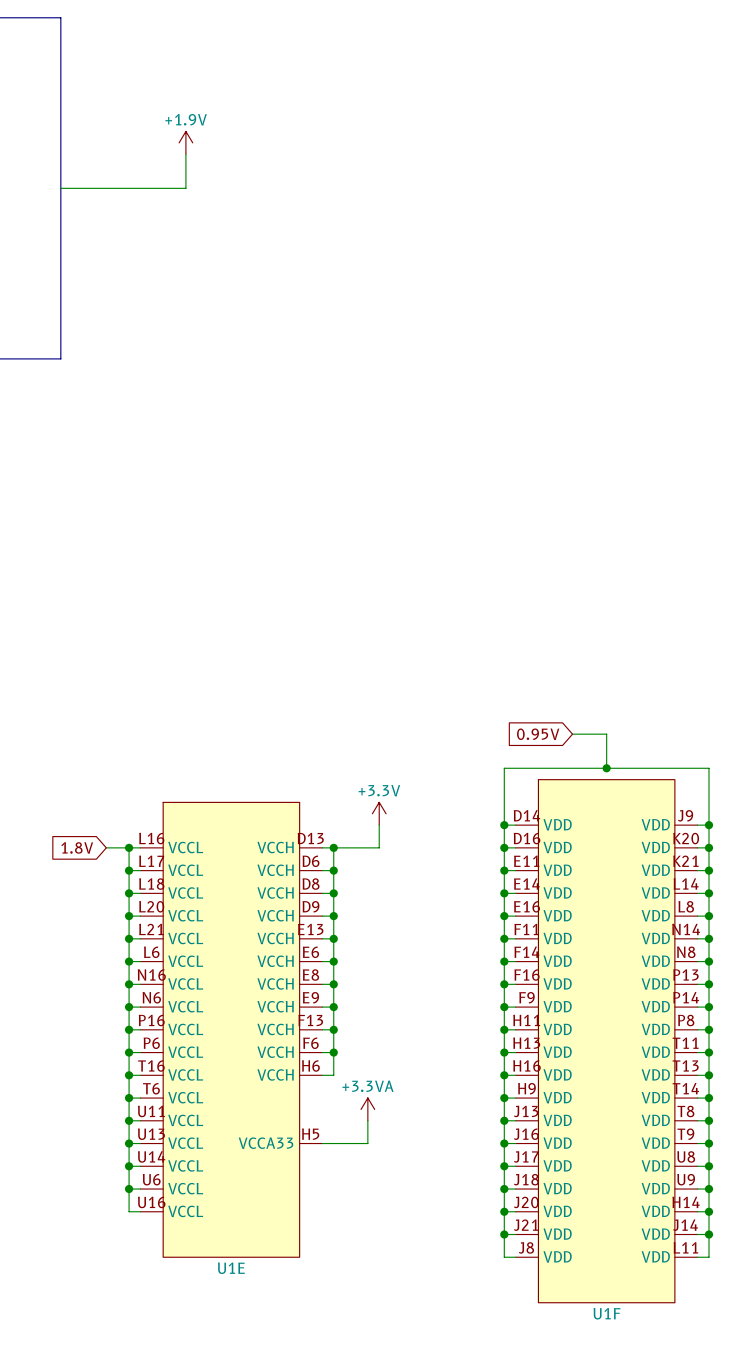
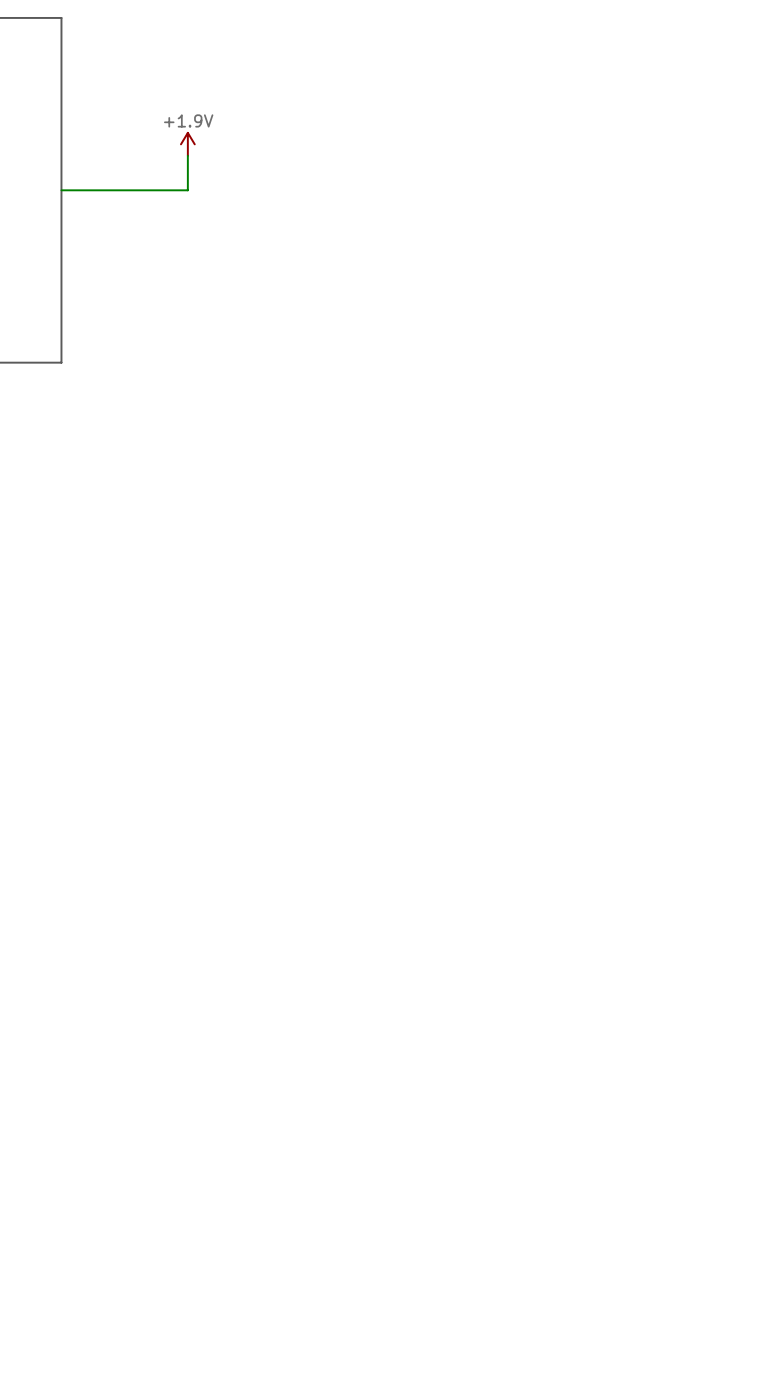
global label: 0.95V (538, 734) -> none
wire: (572, 734) (606, 734) (606, 768) -> none
junction: (606, 768) -> none
power symbol: +3.3V (379, 813) -> none
wire: (379, 825) (379, 847) (322, 847) -> none
wire: (504, 825) (515, 825) -> none
junction: (504, 825) -> none
wire: (697, 825) (709, 825) -> none
junction: (709, 825) -> none
global label: 1.8V (77, 847) -> none
wire: (106, 847) (140, 847) -> none
wire: (129, 847) (129, 1211) (140, 1211) -> none
junction: (129, 847) -> none
wire: (333, 847) (333, 1075) (322, 1075) -> none
junction: (333, 847) -> none
wire: (504, 847) (515, 847) -> none
junction: (504, 847) -> none
wire: (697, 847) (709, 847) -> none
junction: (709, 847) -> none
wire: (129, 870) (140, 870) -> none
junction: (129, 870) -> none
wire: (322, 870) (333, 870) -> none
junction: (333, 870) -> none
wire: (504, 870) (515, 870) -> none
junction: (504, 870) -> none
wire: (697, 870) (709, 870) -> none
junction: (709, 870) -> none
wire: (129, 893) (140, 893) -> none
junction: (129, 893) -> none
wire: (322, 893) (333, 893) -> none
junction: (333, 893) -> none
wire: (504, 893) (515, 893) -> none
junction: (504, 893) -> none
wire: (697, 893) (709, 893) -> none
junction: (709, 893) -> none
wire: (129, 916) (140, 916) -> none
junction: (129, 916) -> none
wire: (322, 916) (333, 916) -> none
junction: (333, 916) -> none
wire: (504, 916) (515, 916) -> none
junction: (504, 916) -> none
wire: (697, 916) (709, 916) -> none
junction: (709, 916) -> none
wire: (129, 938) (140, 938) -> none
junction: (129, 938) -> none
wire: (322, 938) (333, 938) -> none
junction: (333, 938) -> none
wire: (504, 938) (515, 938) -> none
junction: (504, 938) -> none
wire: (697, 938) (709, 938) -> none
junction: (709, 938) -> none
wire: (129, 961) (140, 961) -> none
junction: (129, 961) -> none
wire: (322, 961) (333, 961) -> none
junction: (333, 961) -> none
wire: (504, 961) (515, 961) -> none
junction: (504, 961) -> none
wire: (697, 961) (709, 961) -> none
junction: (709, 961) -> none
wire: (129, 984) (140, 984) -> none
junction: (129, 984) -> none
wire: (322, 984) (333, 984) -> none
junction: (333, 984) -> none
wire: (504, 984) (515, 984) -> none
junction: (504, 984) -> none
wire: (697, 984) (709, 984) -> none
junction: (709, 984) -> none
wire: (129, 1007) (140, 1007) -> none
junction: (129, 1007) -> none
wire: (322, 1007) (333, 1007) -> none
junction: (333, 1007) -> none
wire: (504, 1007) (515, 1007) -> none
junction: (504, 1007) -> none
wire: (697, 1007) (709, 1007) -> none
junction: (709, 1007) -> none
wire: (129, 1029) (140, 1029) -> none
junction: (129, 1029) -> none
U1E: (231, 1029) -> none
wire: (322, 1029) (333, 1029) -> none
junction: (333, 1029) -> none
wire: (504, 1029) (515, 1029) -> none
junction: (504, 1029) -> none
wire: (697, 1029) (709, 1029) -> none
junction: (709, 1029) -> none
U1F: (606, 1041) -> none
wire: (129, 1052) (140, 1052) -> none
junction: (129, 1052) -> none
wire: (322, 1052) (333, 1052) -> none
junction: (333, 1052) -> none
wire: (504, 1052) (515, 1052) -> none
junction: (504, 1052) -> none
wire: (697, 1052) (709, 1052) -> none
junction: (709, 1052) -> none
wire: (129, 1075) (140, 1075) -> none
junction: (129, 1075) -> none
wire: (504, 1075) (515, 1075) -> none
junction: (504, 1075) -> none
wire: (697, 1075) (709, 1075) -> none
junction: (709, 1075) -> none
wire: (129, 1098) (140, 1098) -> none
junction: (129, 1098) -> none
wire: (504, 1098) (515, 1098) -> none
junction: (504, 1098) -> none
wire: (697, 1098) (709, 1098) -> none
junction: (709, 1098) -> none
power symbol: +3.3VA (367, 1109) -> none
wire: (129, 1120) (140, 1120) -> none
junction: (129, 1120) -> none
wire: (367, 1120) (367, 1143) (322, 1143) -> none
wire: (504, 1120) (515, 1120) -> none
junction: (504, 1120) -> none
wire: (697, 1120) (709, 1120) -> none
junction: (709, 1120) -> none
wire: (129, 1143) (140, 1143) -> none
junction: (129, 1143) -> none
wire: (504, 1143) (515, 1143) -> none
junction: (504, 1143) -> none
wire: (697, 1143) (709, 1143) -> none
junction: (709, 1143) -> none
wire: (129, 1166) (140, 1166) -> none
junction: (129, 1166) -> none
wire: (504, 1166) (515, 1166) -> none
junction: (504, 1166) -> none
wire: (697, 1166) (709, 1166) -> none
junction: (709, 1166) -> none
wire: (129, 1189) (140, 1189) -> none
junction: (129, 1189) -> none
wire: (504, 1189) (515, 1189) -> none
junction: (504, 1189) -> none
wire: (697, 1189) (709, 1189) -> none
junction: (709, 1189) -> none
wire: (504, 1211) (515, 1211) -> none
junction: (504, 1211) -> none
wire: (697, 1211) (709, 1211) -> none
junction: (709, 1211) -> none
wire: (504, 1234) (515, 1234) -> none
junction: (504, 1234) -> none
wire: (697, 1234) (709, 1234) -> none
junction: (709, 1234) -> none
wire: (515, 1257) (504, 1257) (504, 768) (709, 768) (709, 1257) (697, 1257) -> none

